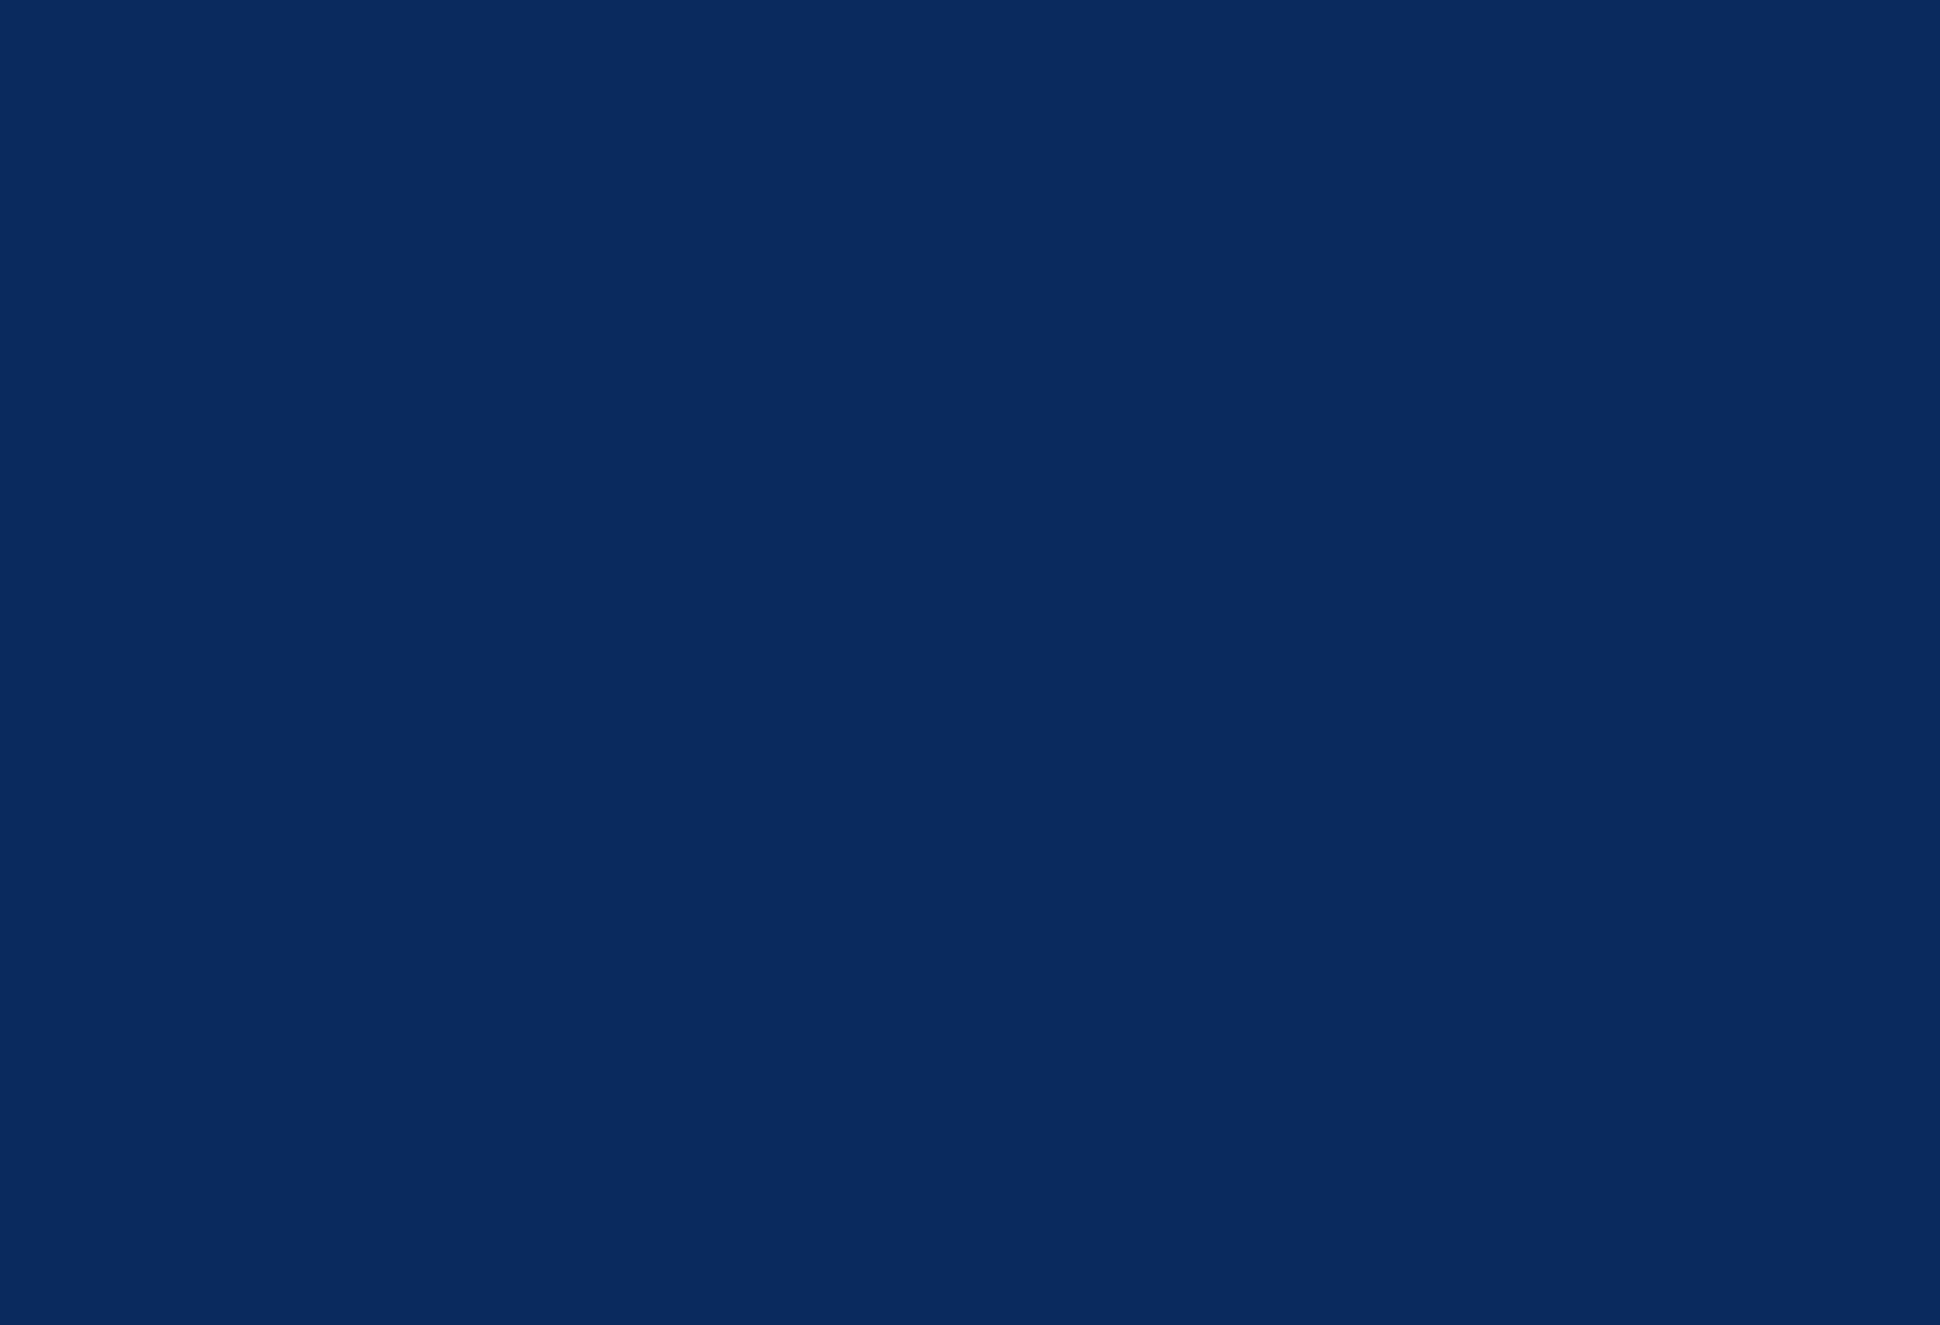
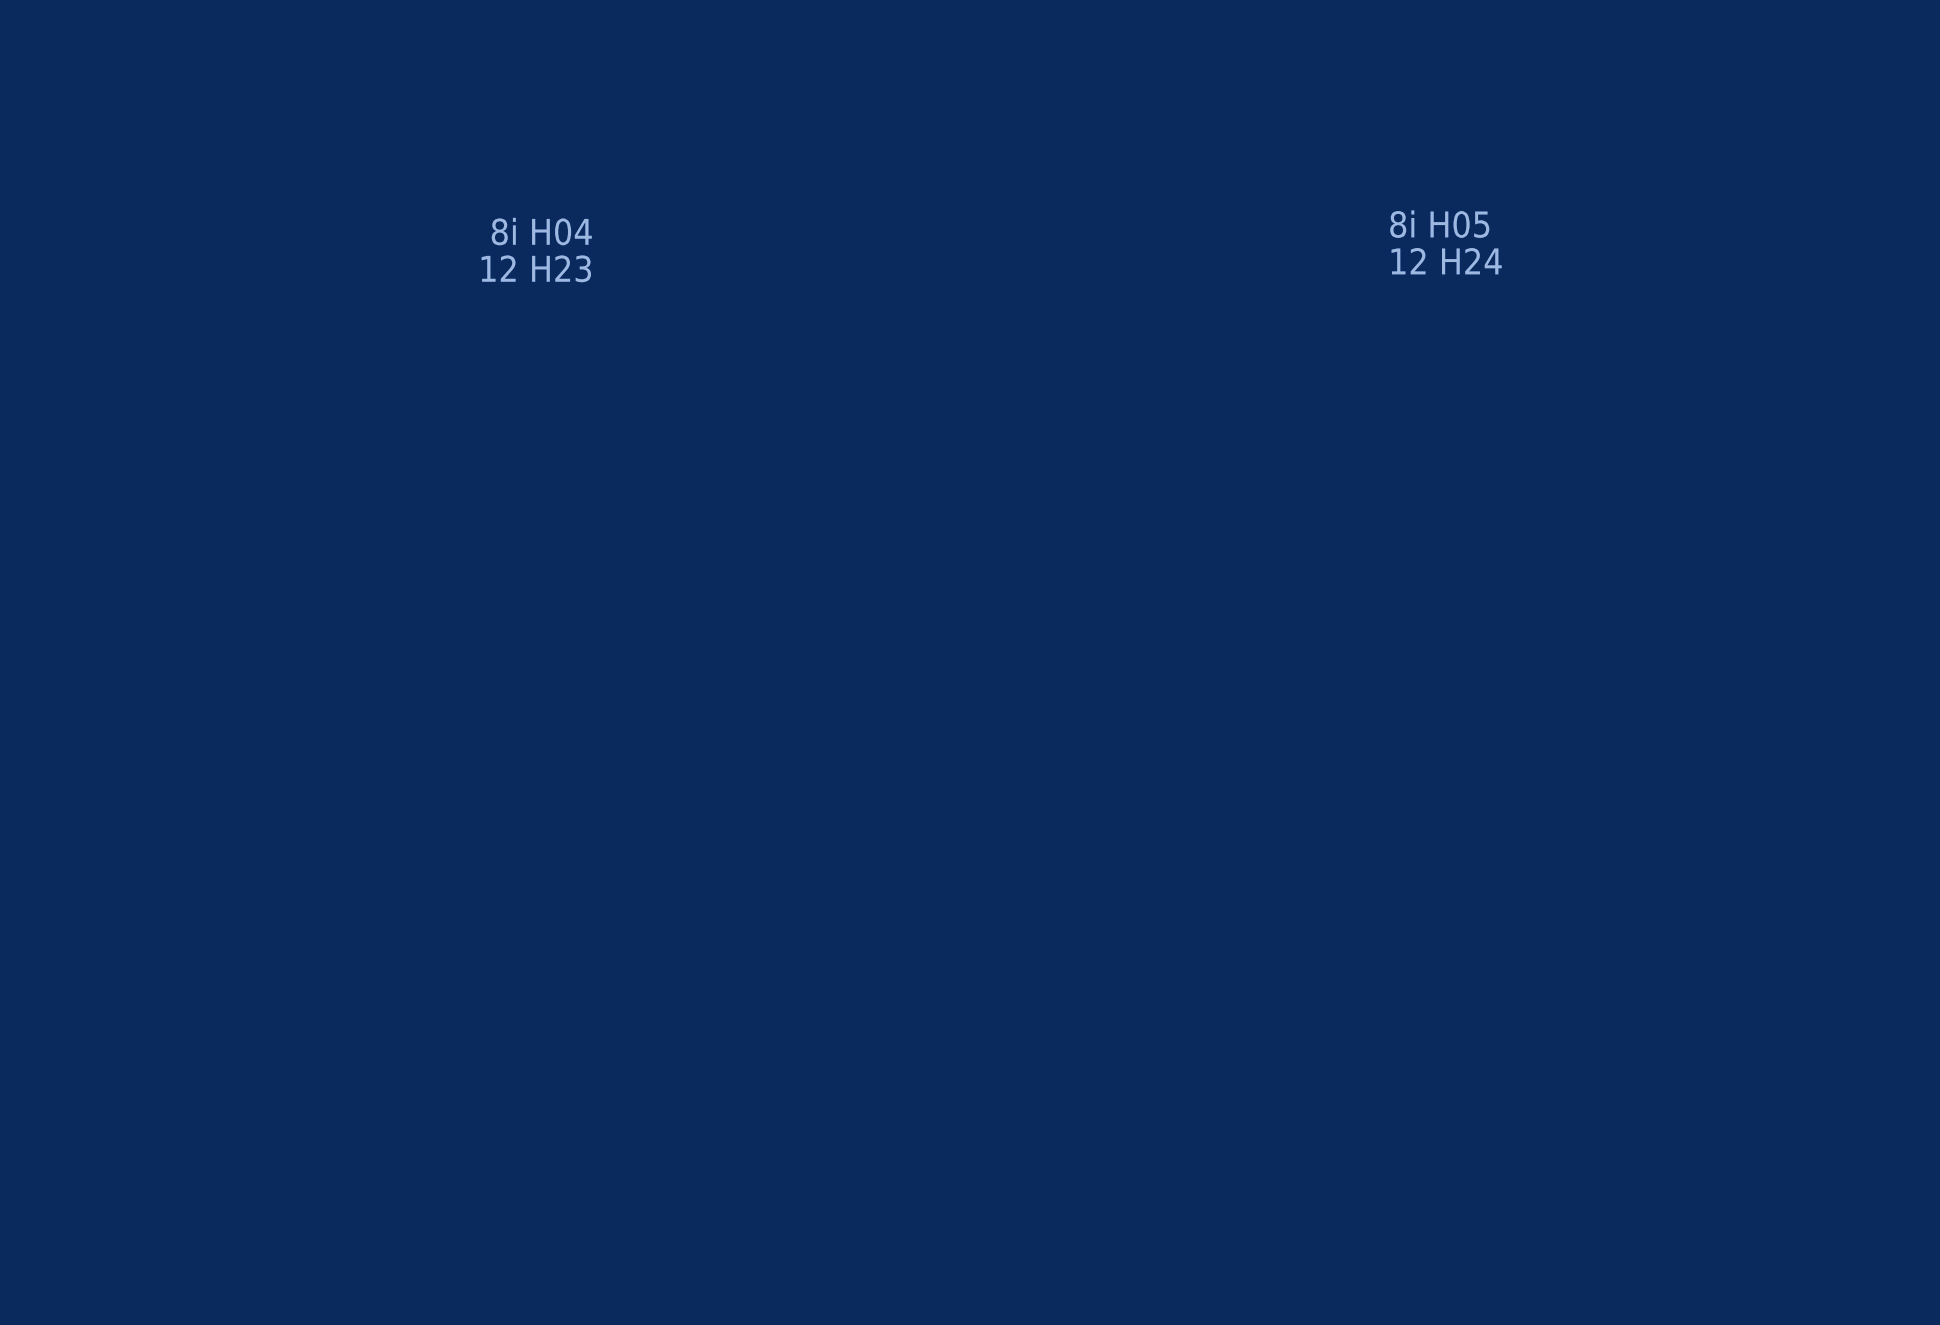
text: none -> 8i H05 (1439, 224)
text: none -> 8i H04 (541, 231)
text: none -> 12 H24 (1446, 261)
text: none -> 12 H23 (536, 268)

